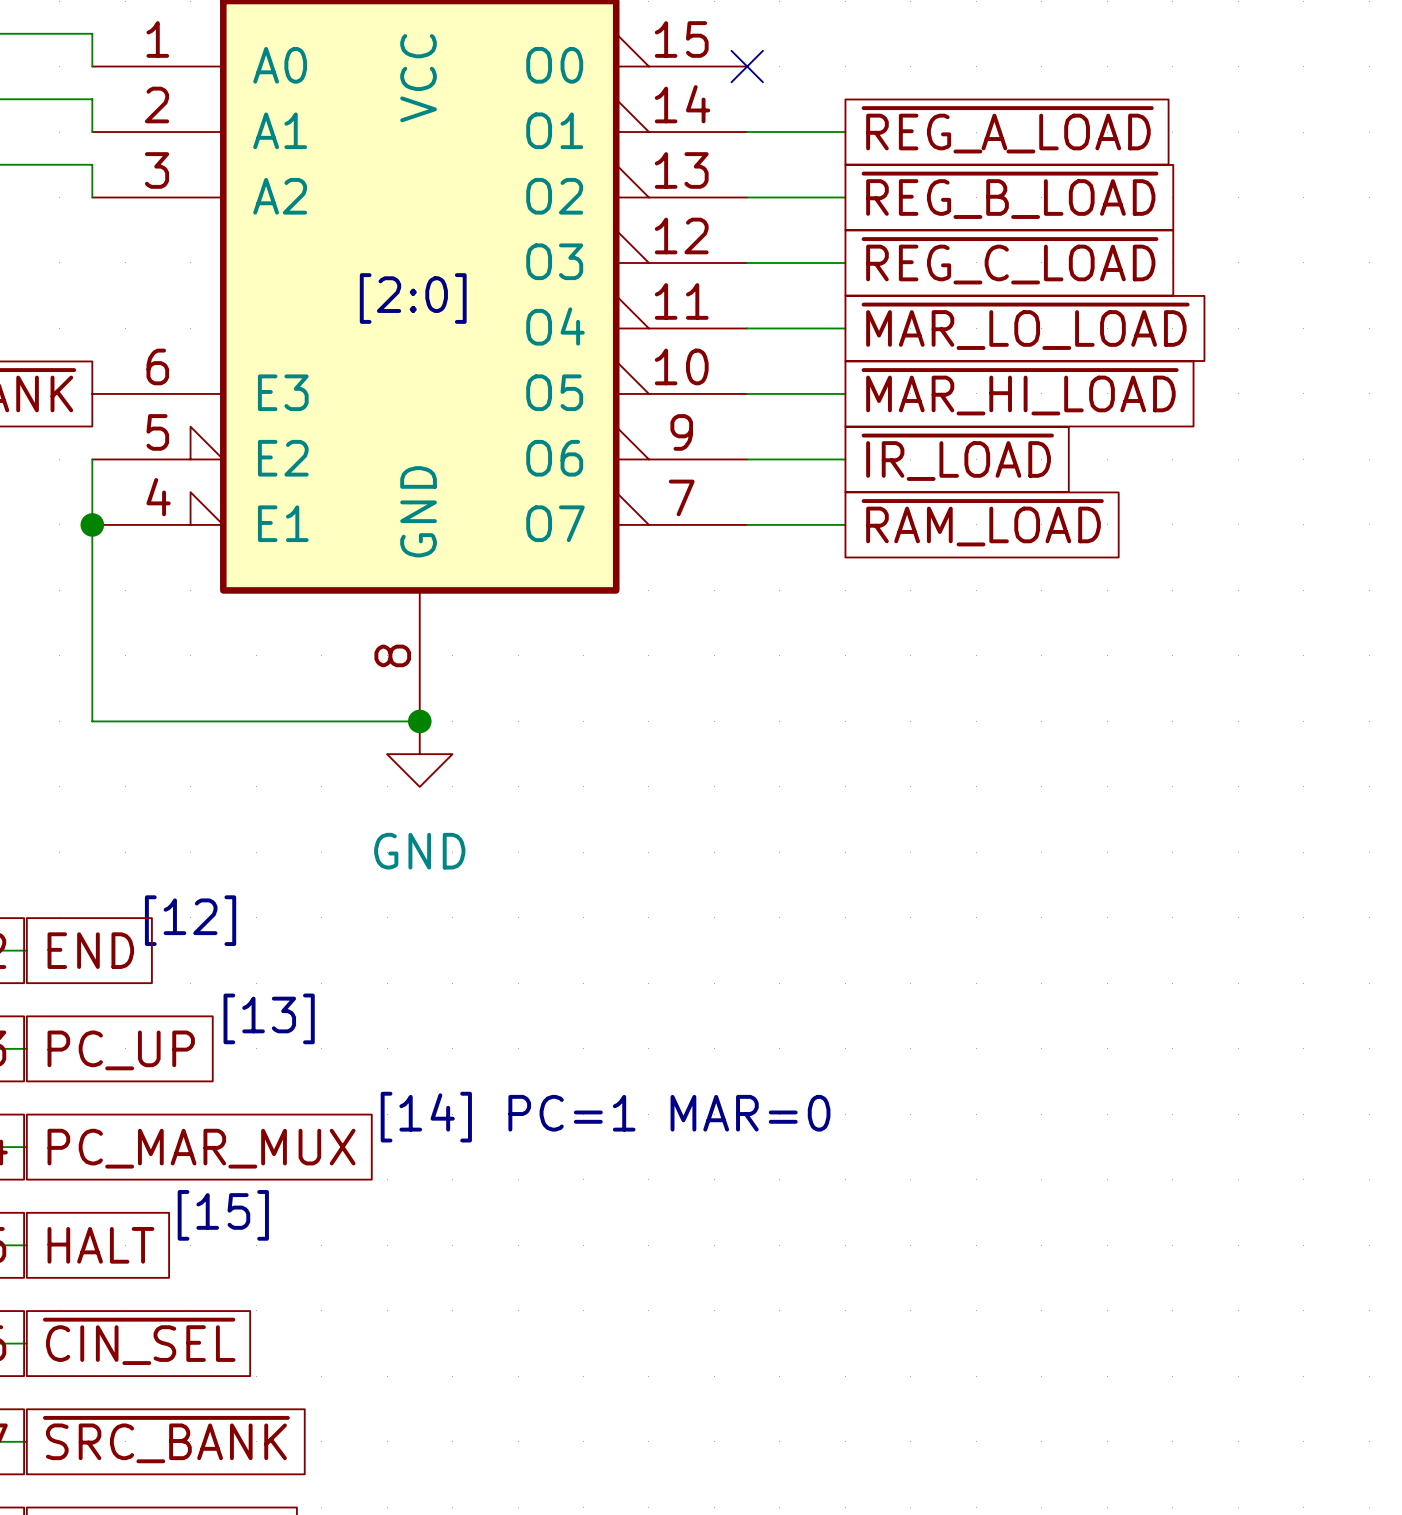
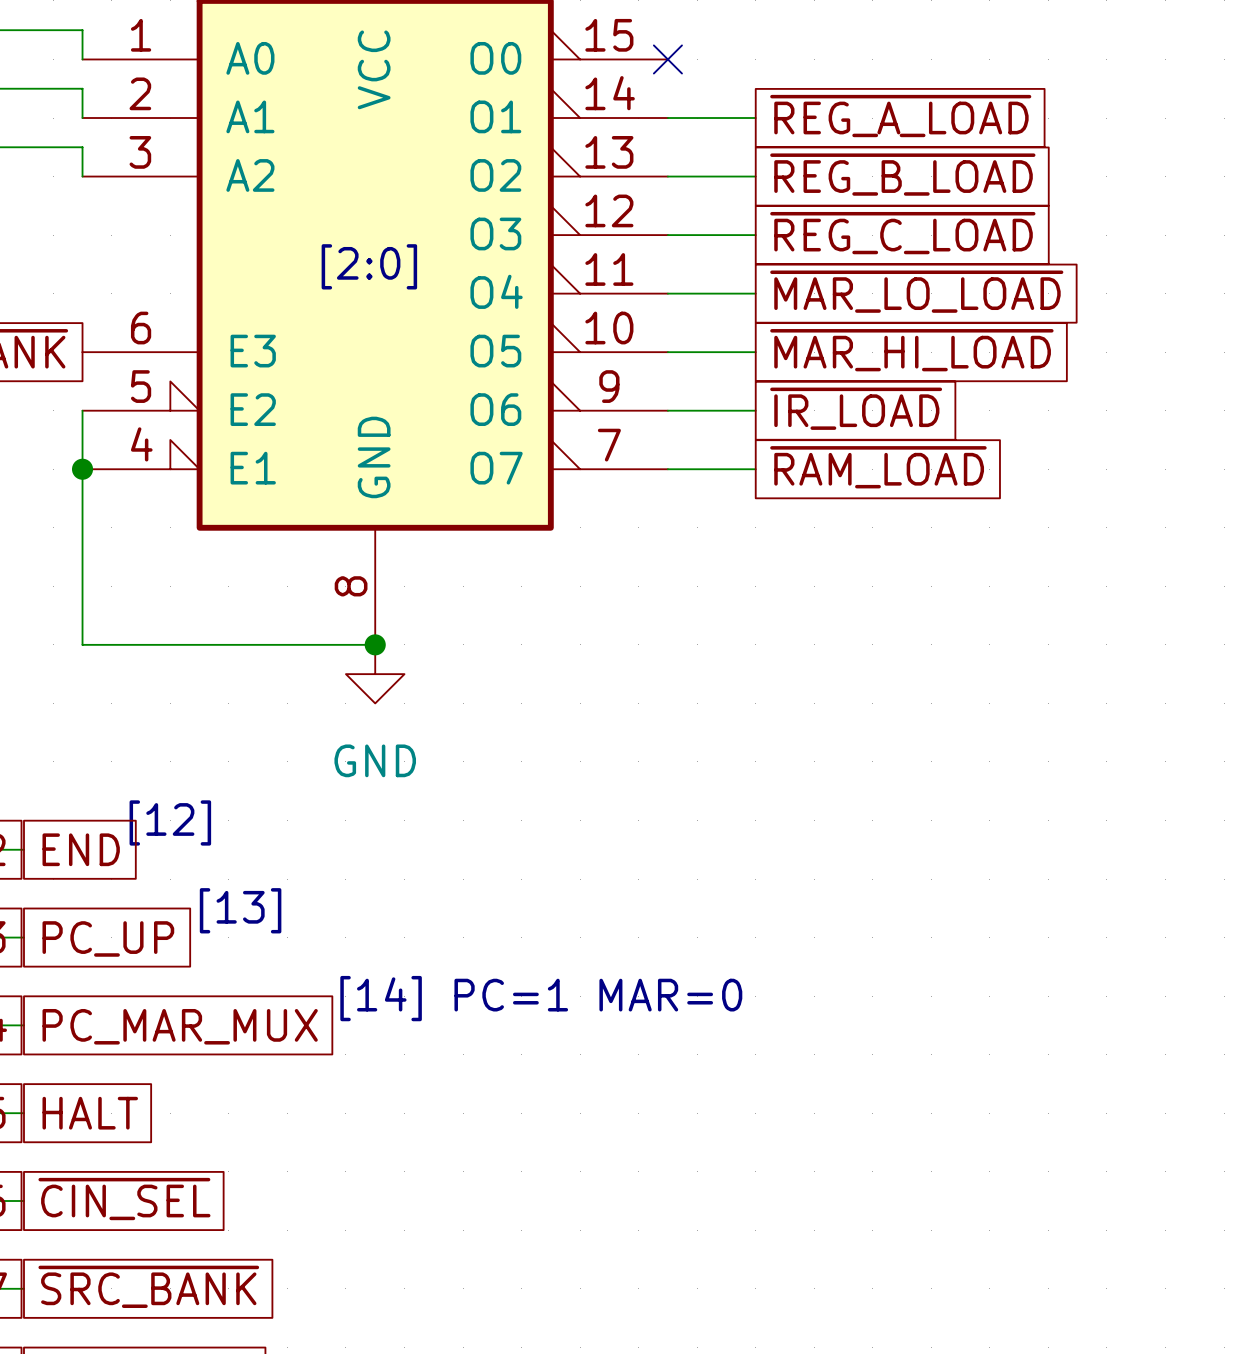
text: [15] (223, 1215) -> none

